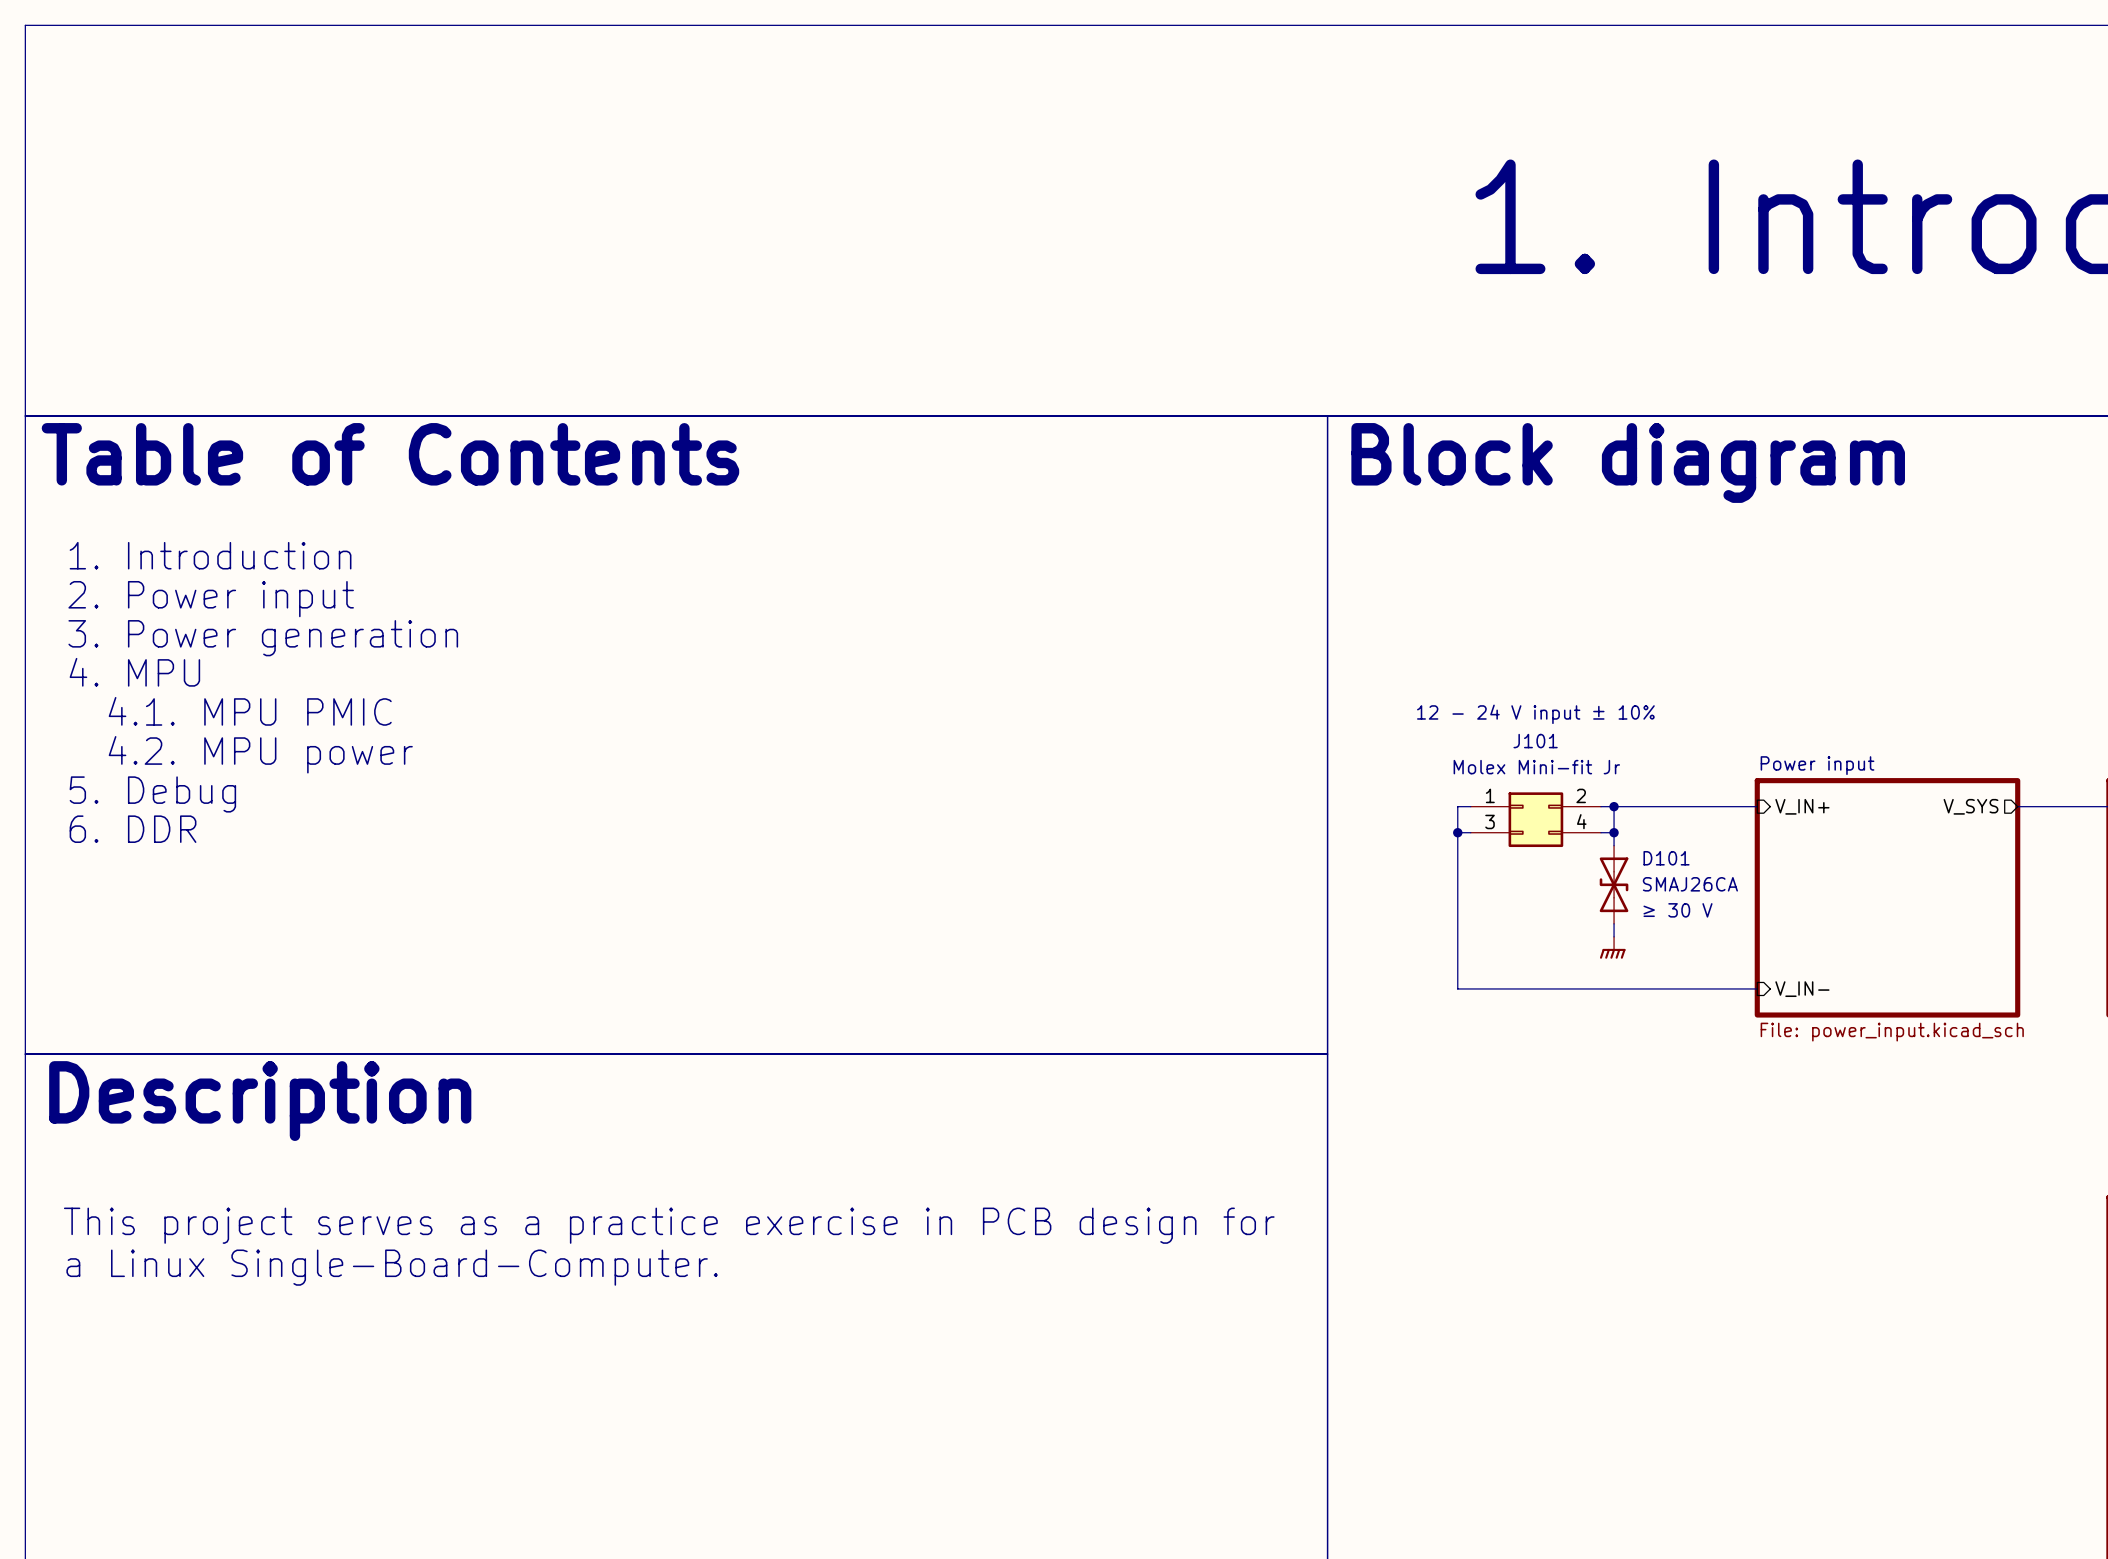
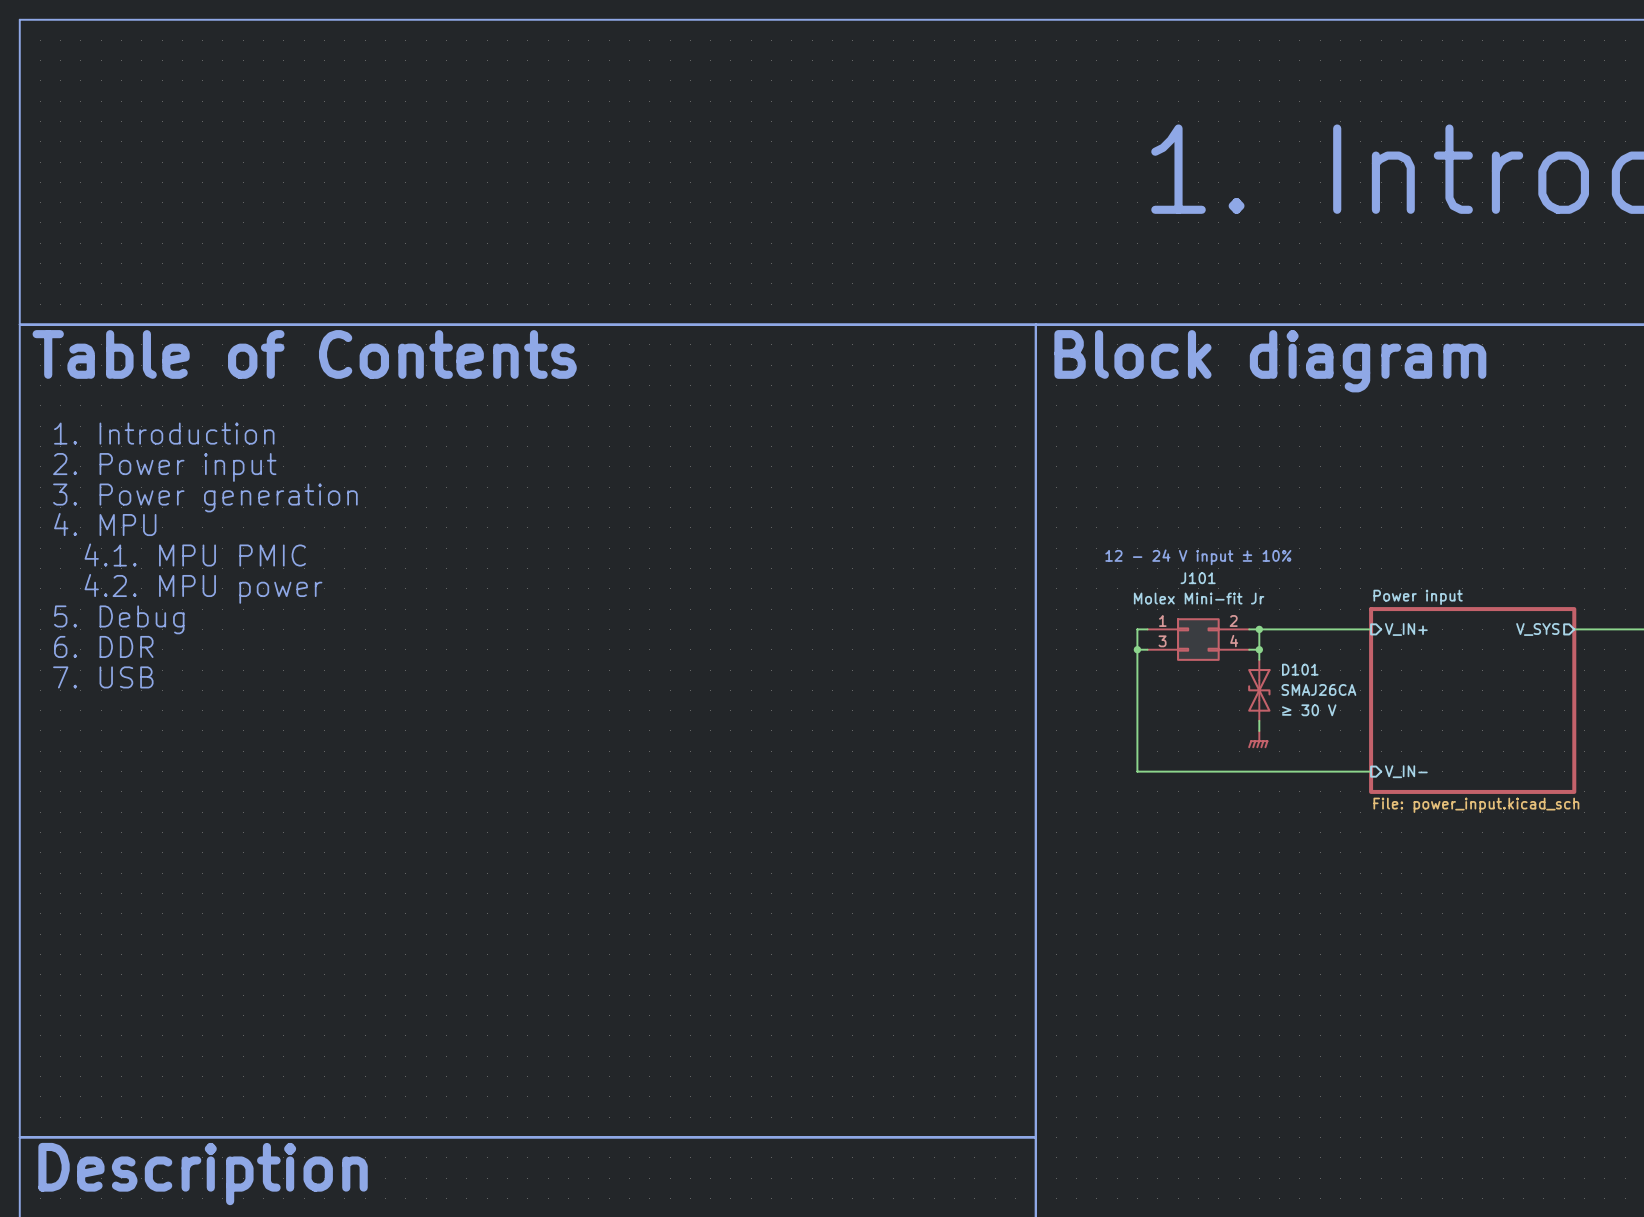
text: none -> 7. USB (103, 677)
line: (25, 1054) (1327, 1054) -> none
text: Description (260, 1101) -> none
text: This project serves as a practice exercise in PCB design for (669, 1225) -> none
text: a Linux Single-Board-Computer. (392, 1267) -> none
line: none -> (19, 1137) (1035, 1137)
text: none -> Description (203, 1174)

